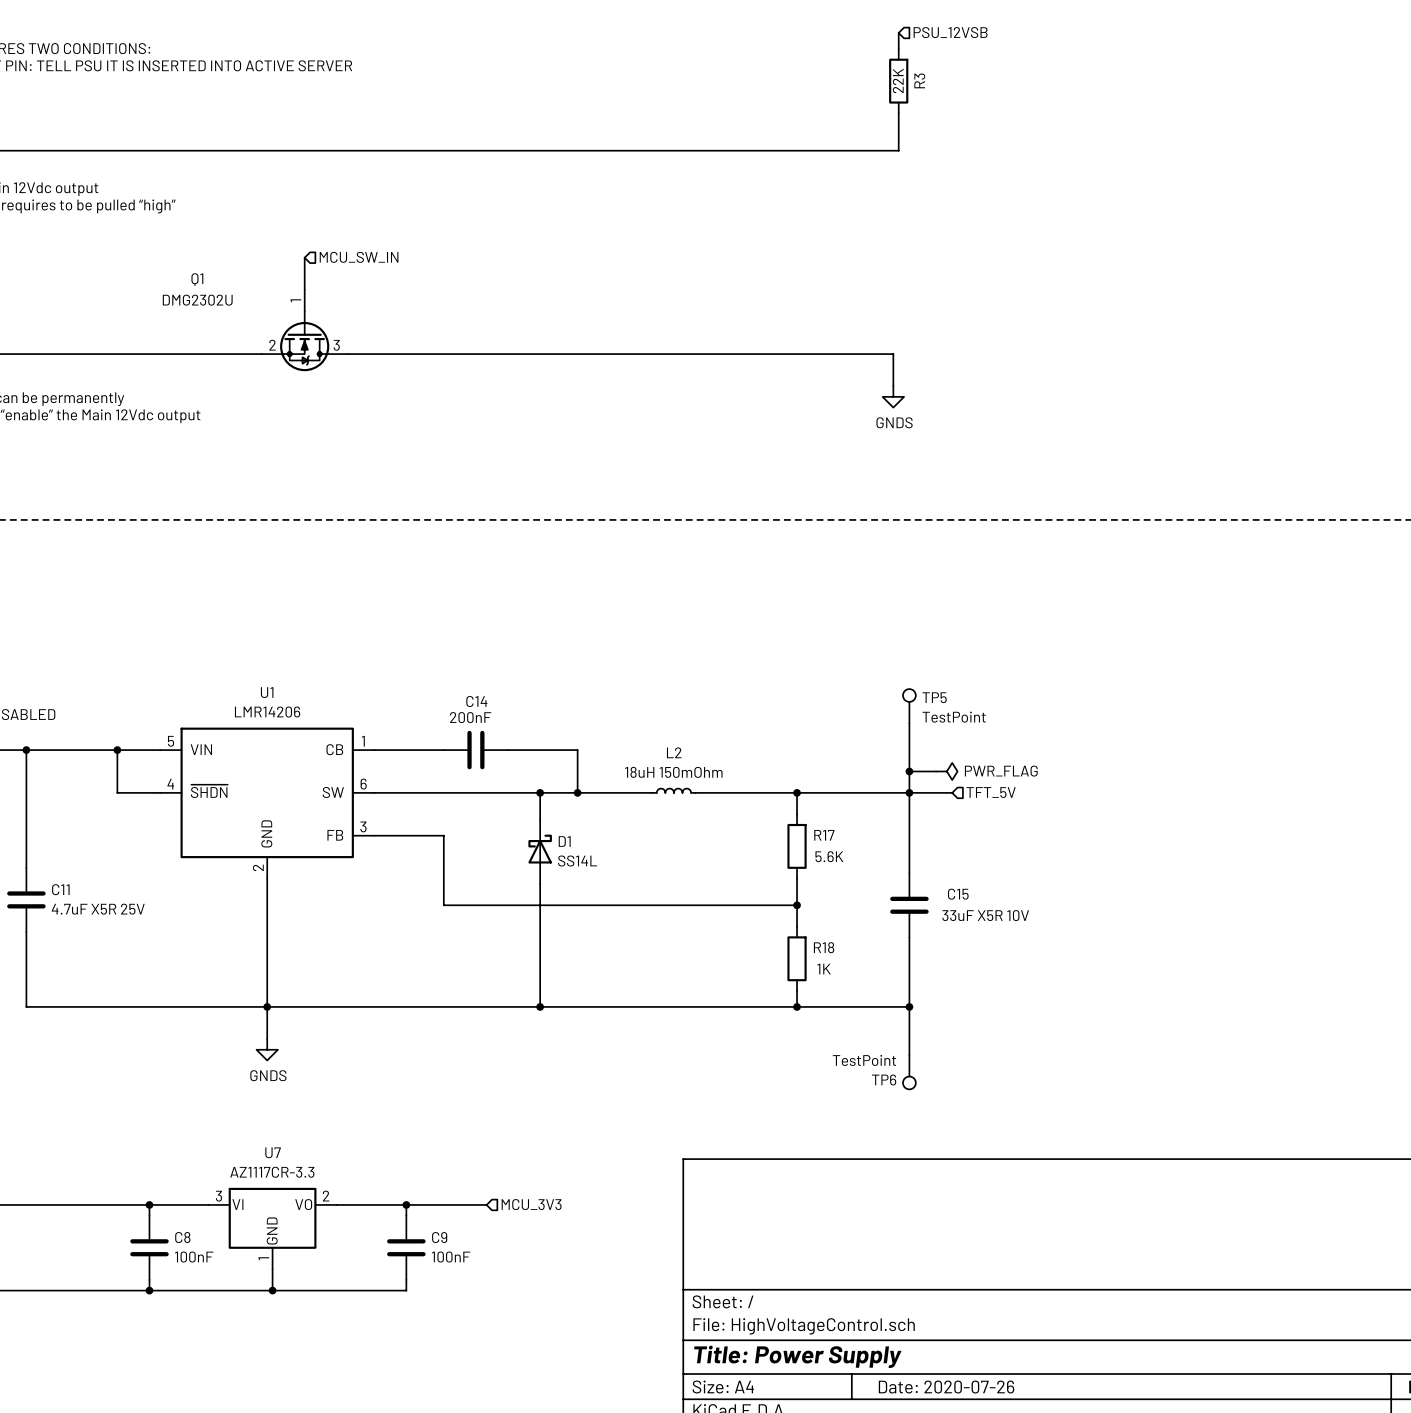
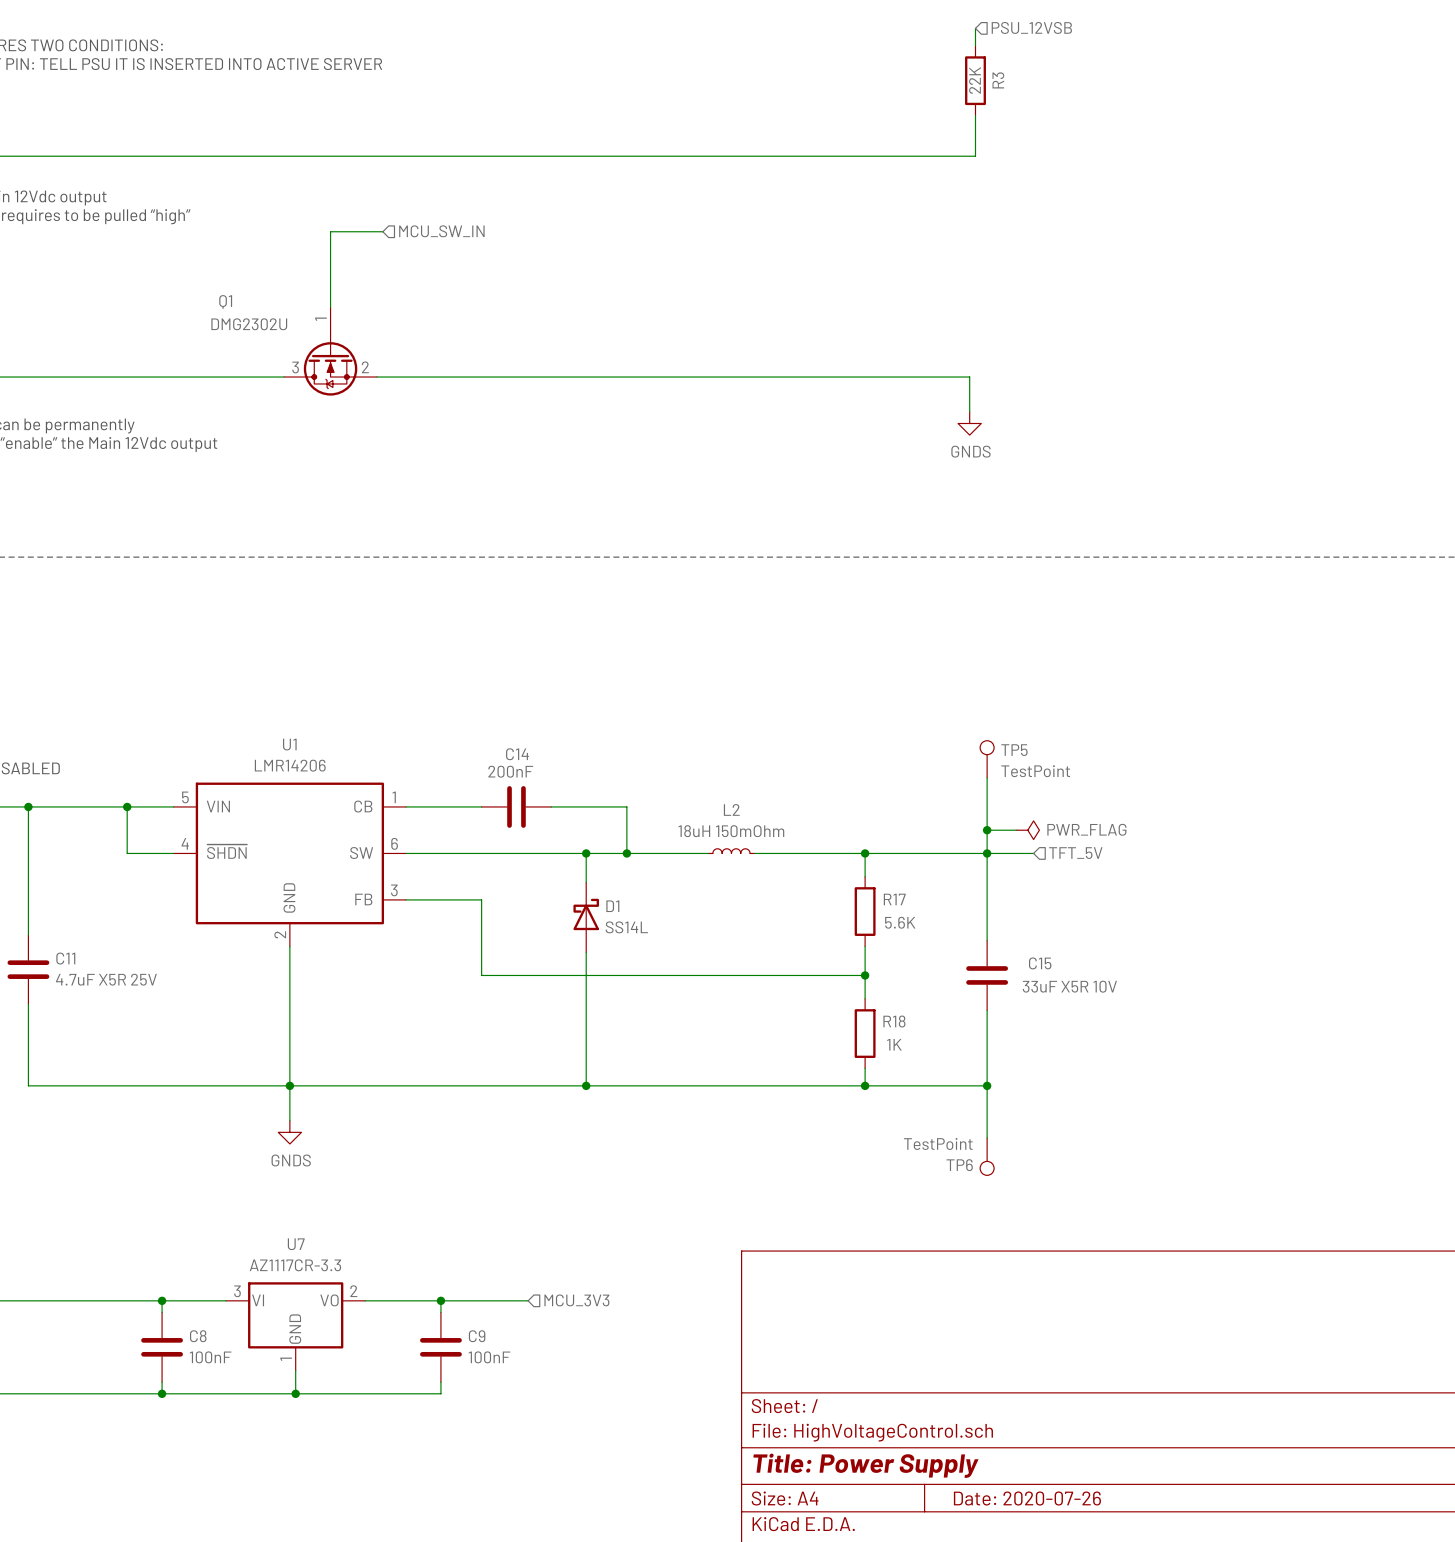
wire: none -> (382, 231) (330, 231) (330, 272)
hierarchical label position: MCU_SW_IN (359, 257) -> MCU_SW_IN (441, 231)
Q1 value position: DMG2302U (197, 300) -> DMG2302U (249, 324)
Q1 flip: as is (304, 341) -> left-right (330, 363)

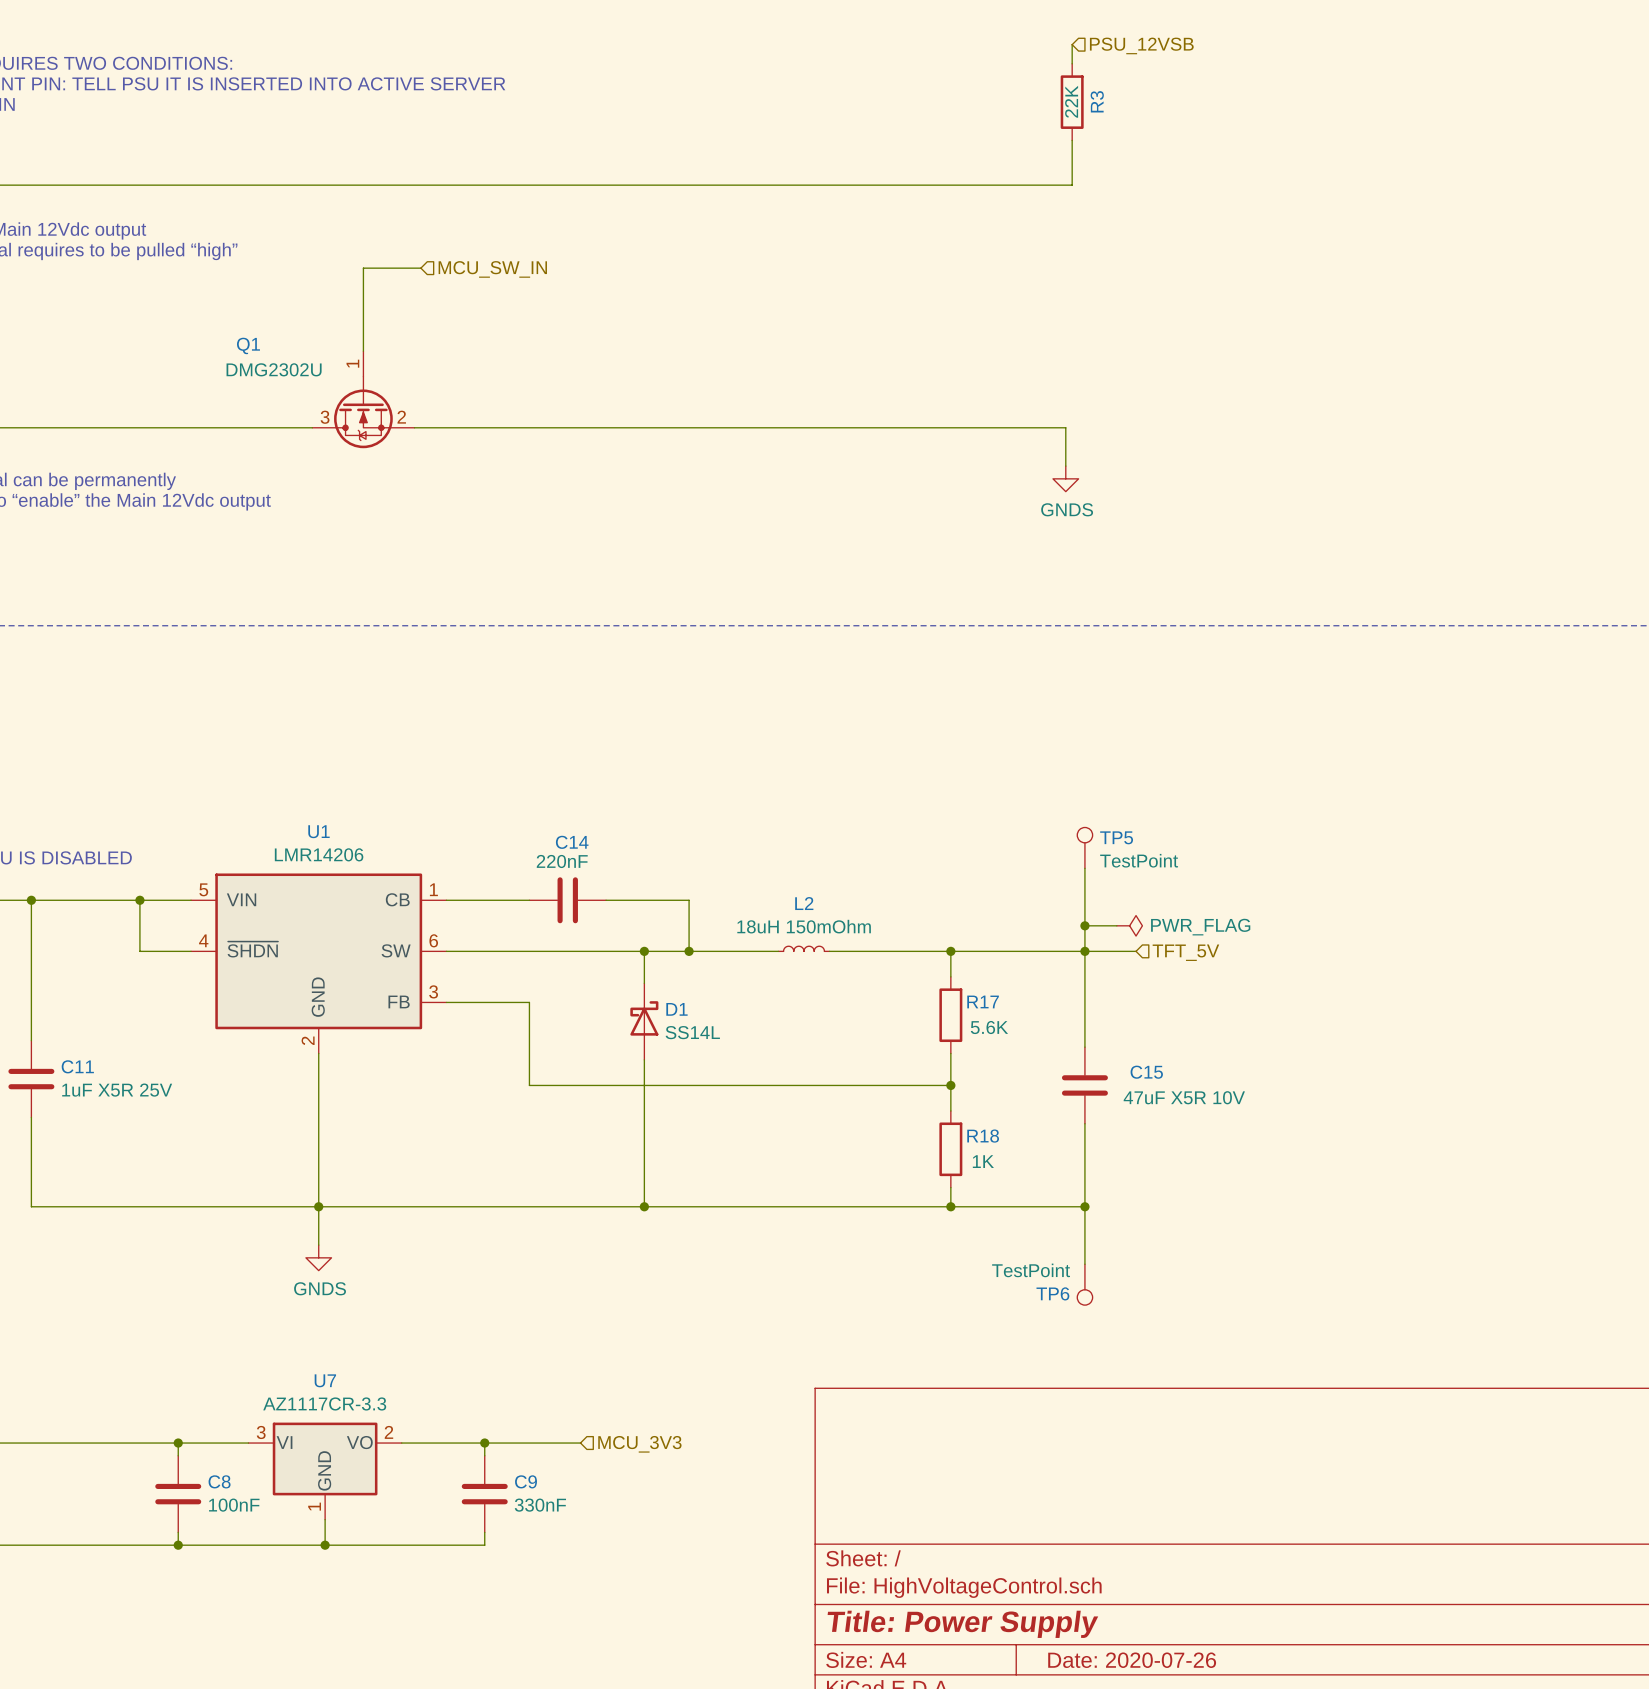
C14 value: 200nF (510, 771) -> 220nF (562, 861)
C11 value: 4.7uF X5R 25V (106, 979) -> 1uF X5R 25V (117, 1090)
C15 value: 33uF X5R 10V (1069, 986) -> 47uF X5R 10V (1184, 1097)
C9 value: 100nF (489, 1357) -> 330nF (540, 1505)

